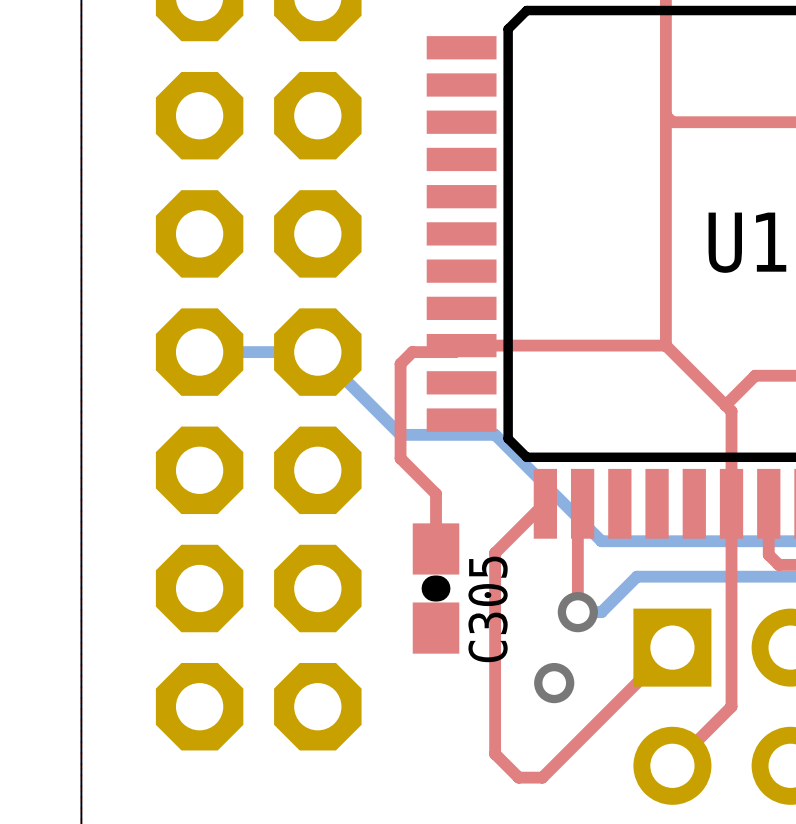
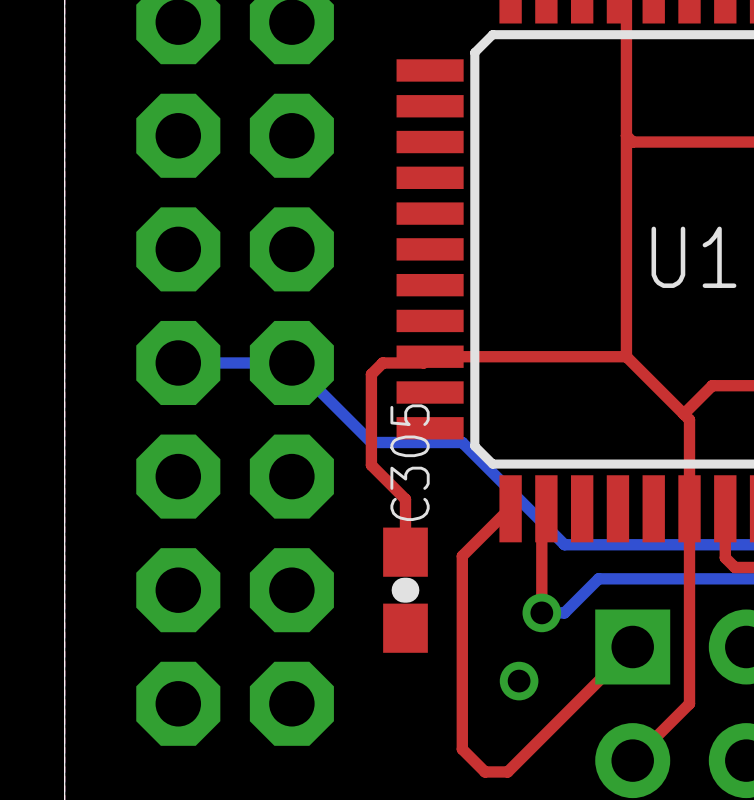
C305 name position: C305 (488, 609) -> C305 (410, 462)

